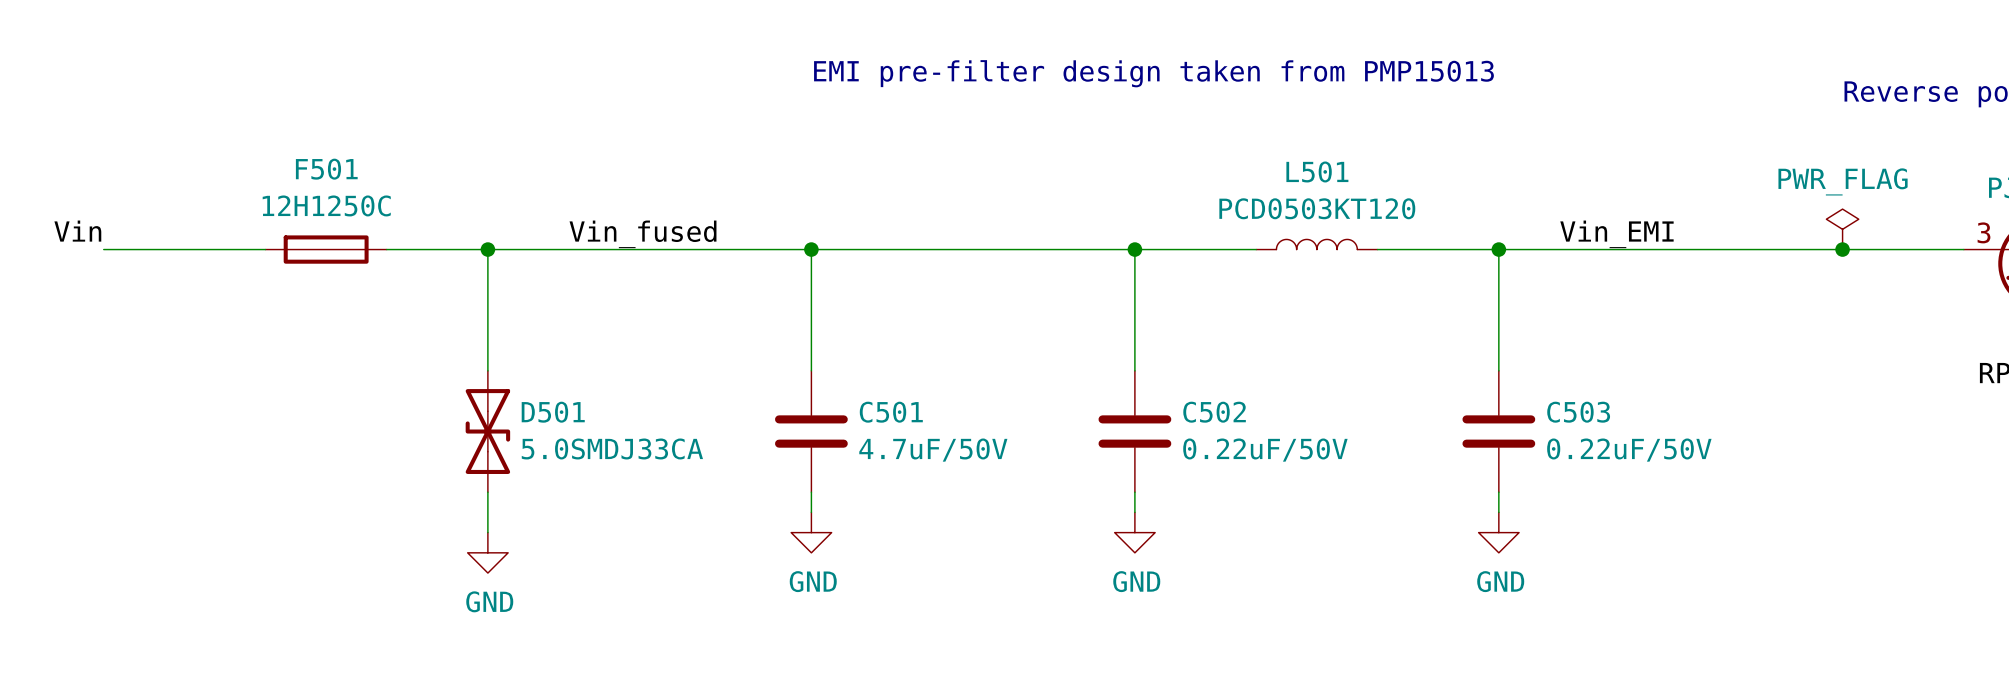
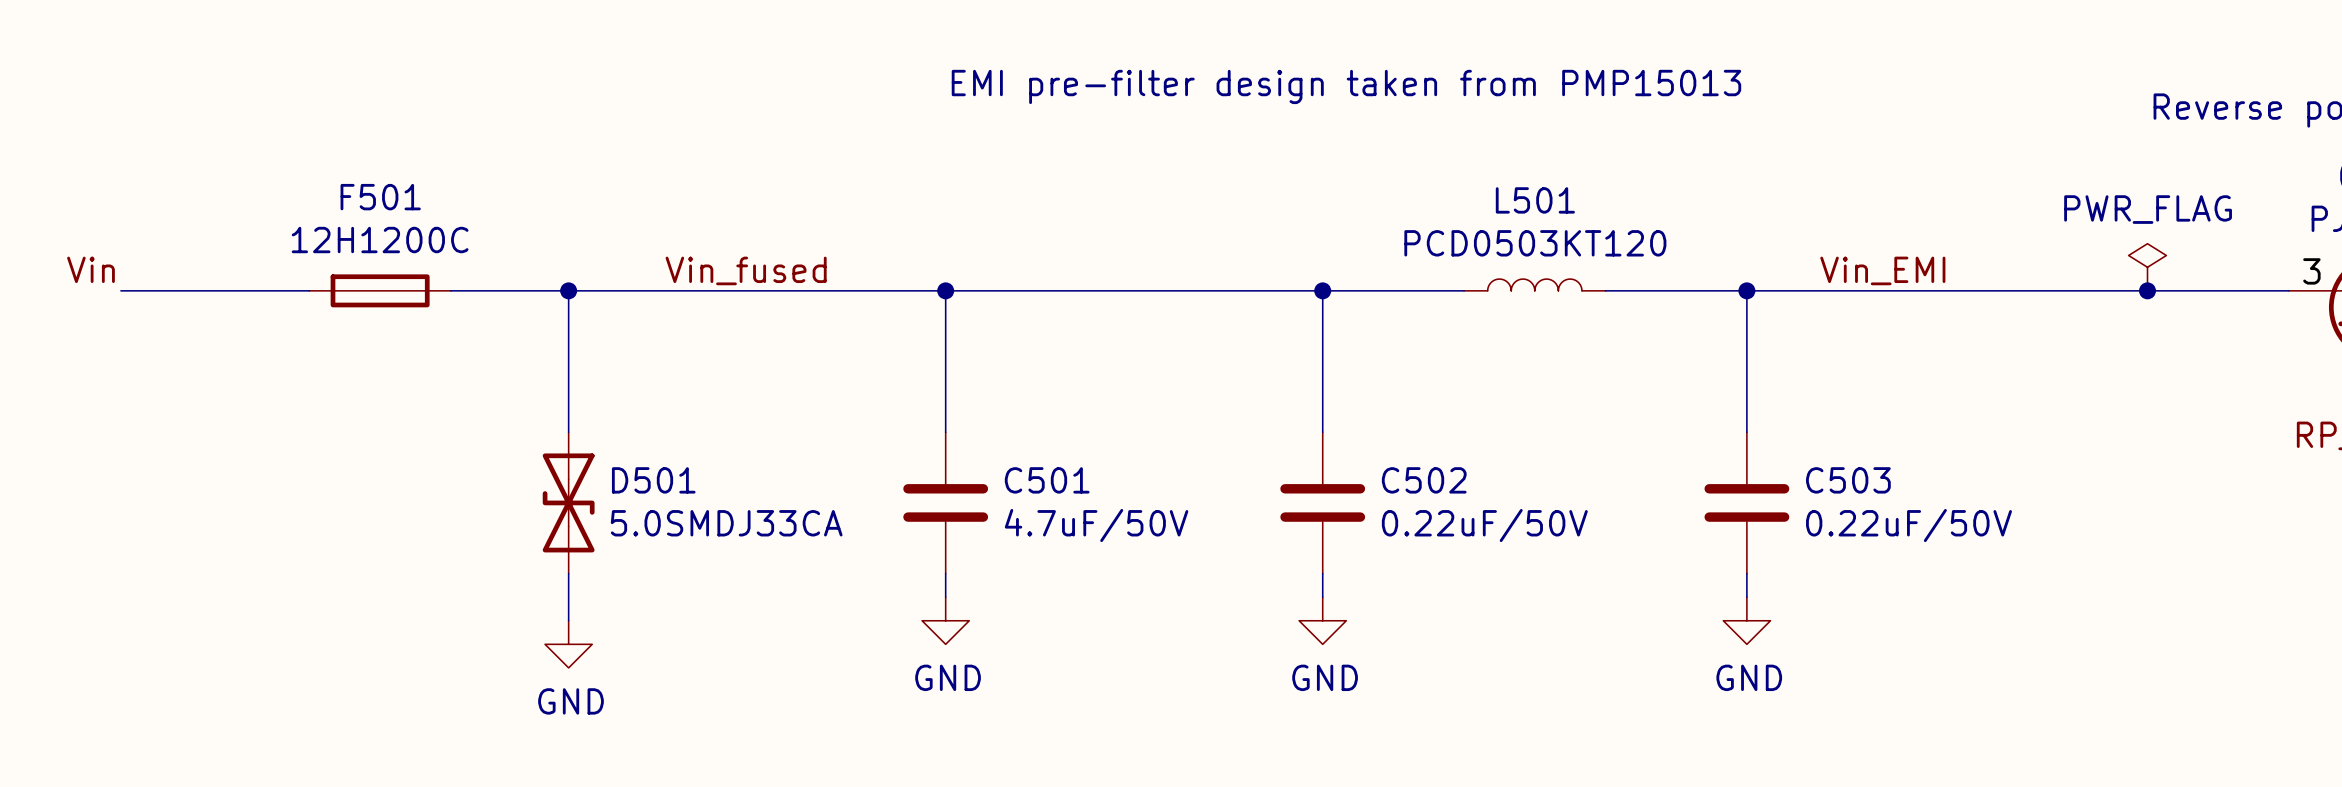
F501 value: 12H1250C (326, 205) -> 12H1200C (380, 240)

